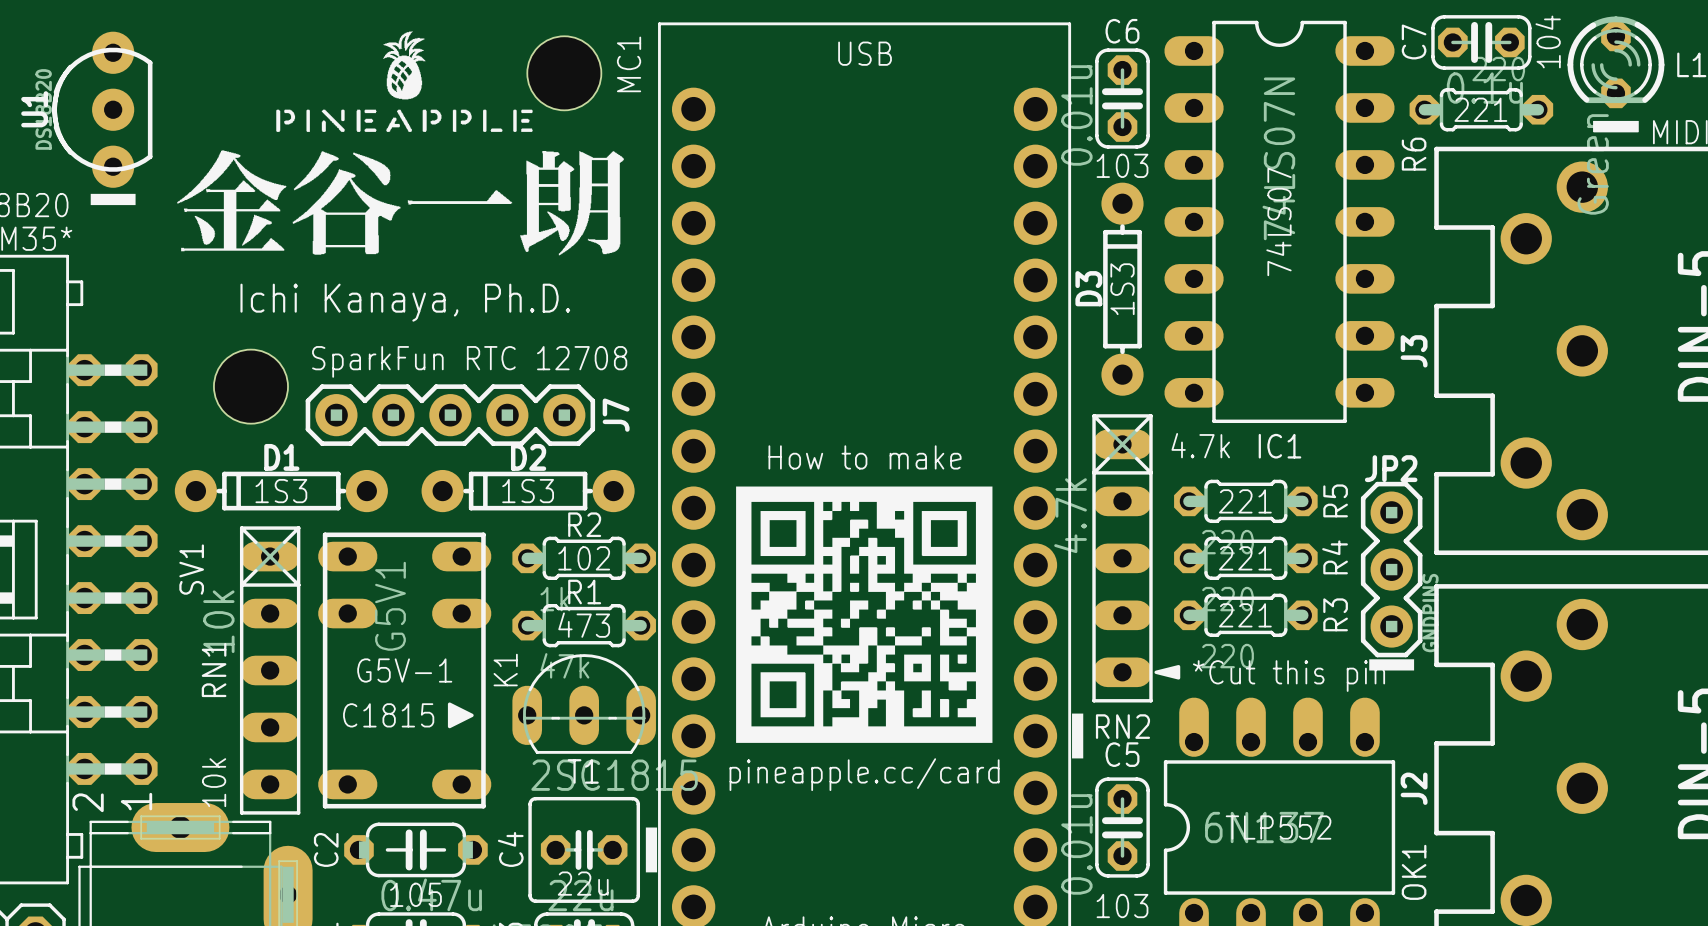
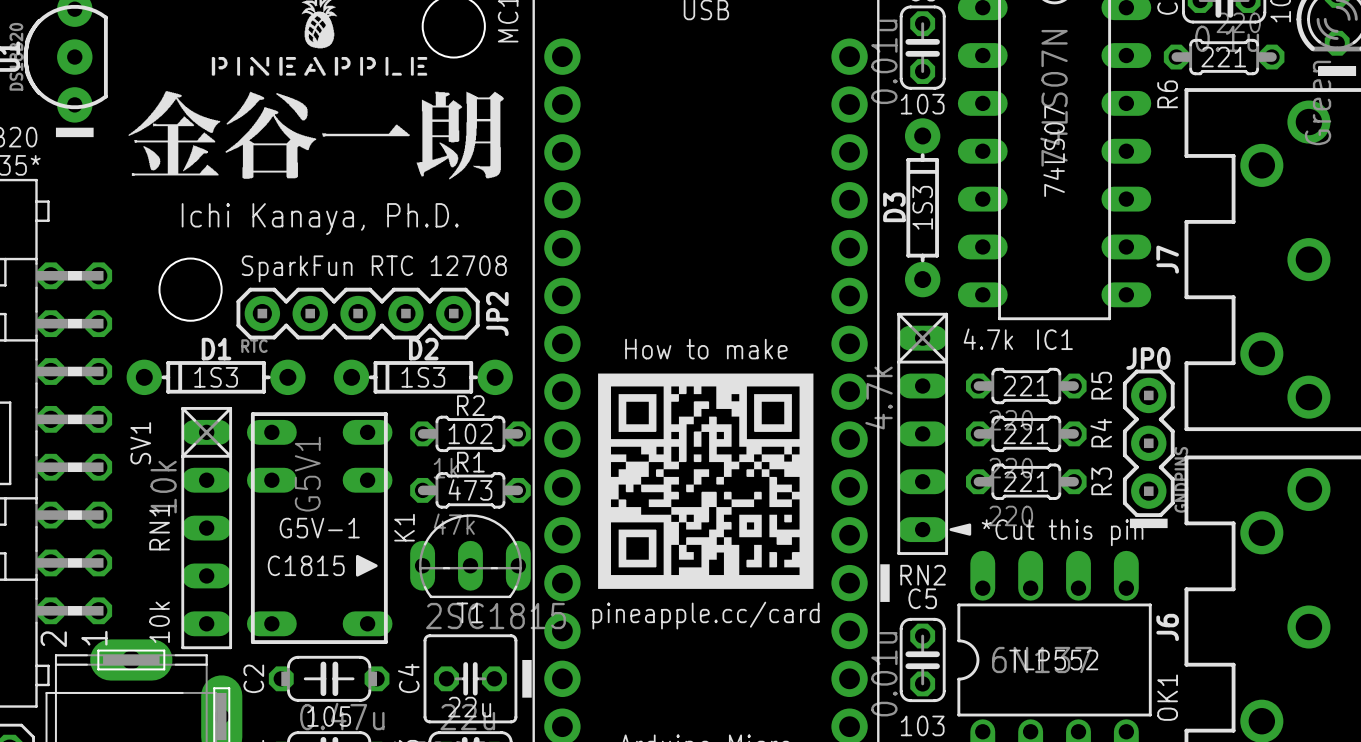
J3 name: J3 (1414, 351) -> J7 (1167, 259)
J7 name: J7 (616, 415) -> JP2 (497, 313)
J7 value: none -> RTC (254, 346)
JP2 name: JP2 (1391, 468) -> JP0 (1148, 358)
J2 name: J2 (1414, 788) -> J6 (1167, 627)

